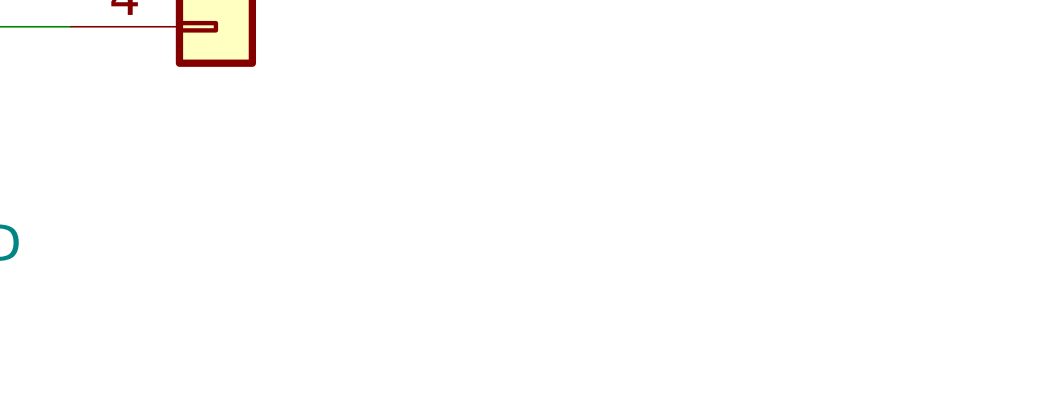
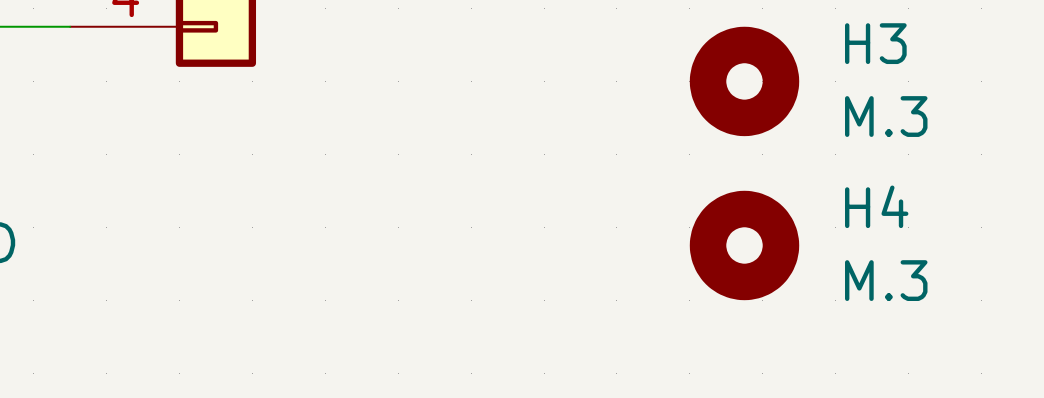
H3: none -> M.3 (744, 81)
H4: none -> M.3 (744, 245)

